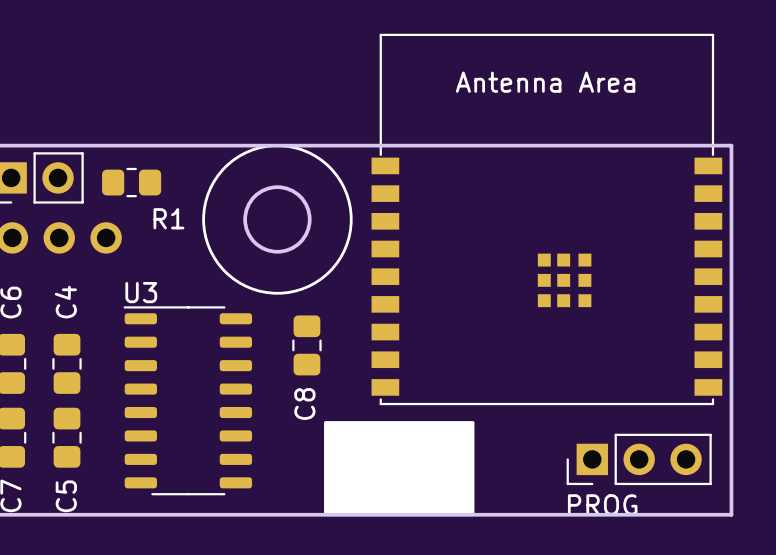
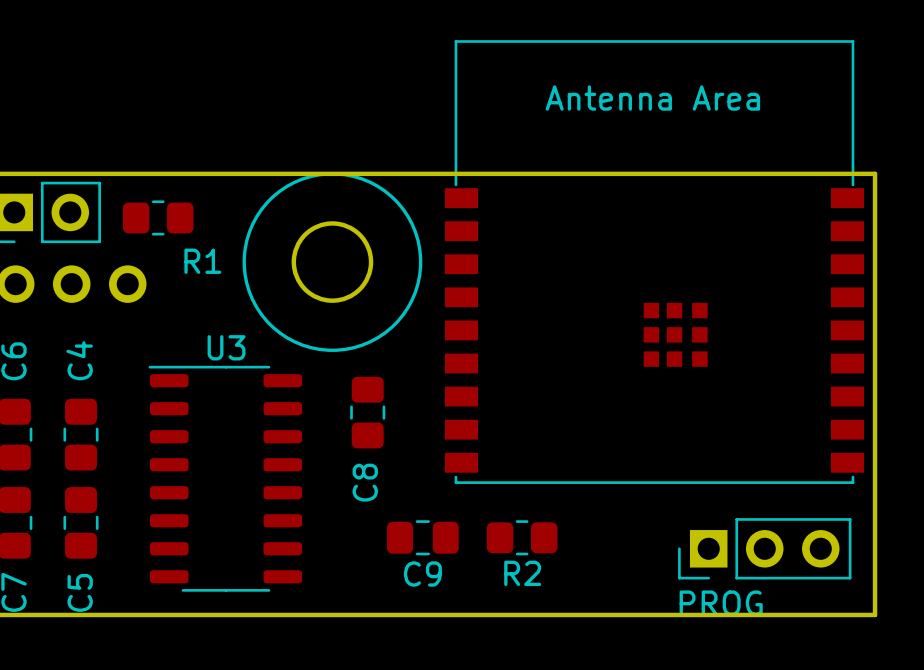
U3 name position: U3 (141, 292) -> U3 (226, 347)
drawing: [324, 421, 475, 517] -> none
C9: none -> (422, 537)
R2: none -> (522, 537)

